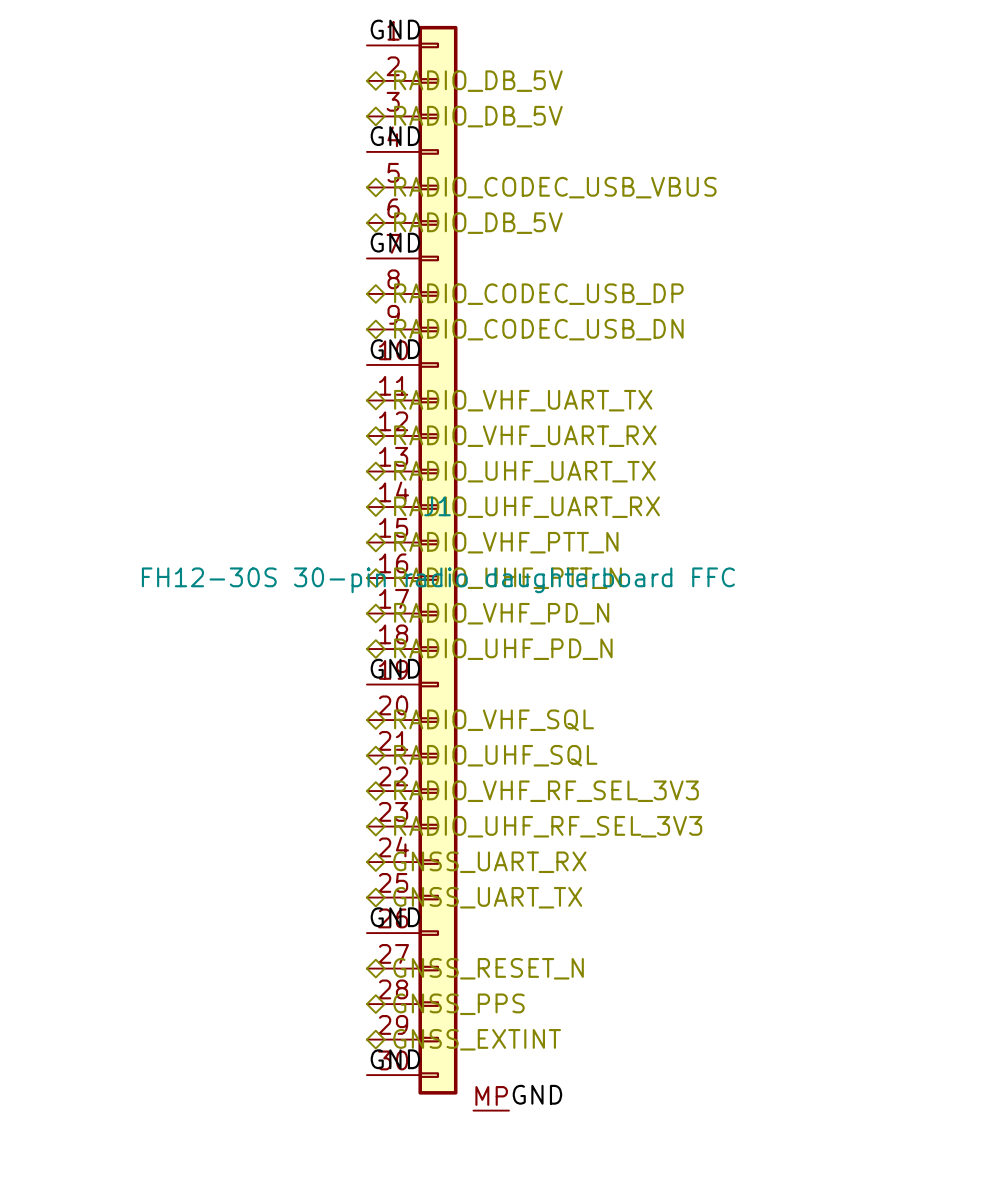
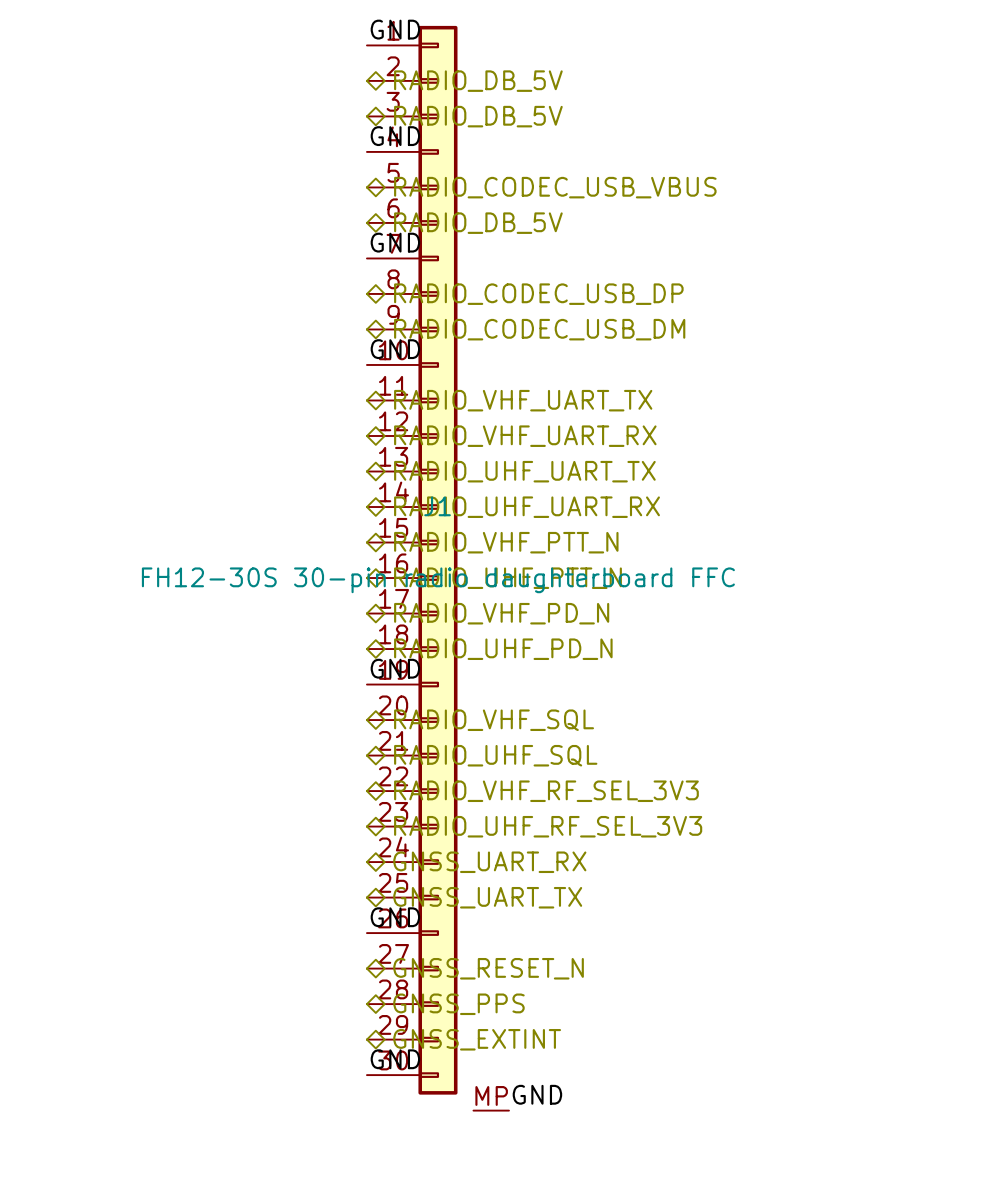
hierarchical label: RADIO_CODEC_USB_DN (538, 329) -> RADIO_CODEC_USB_DM (539, 329)

